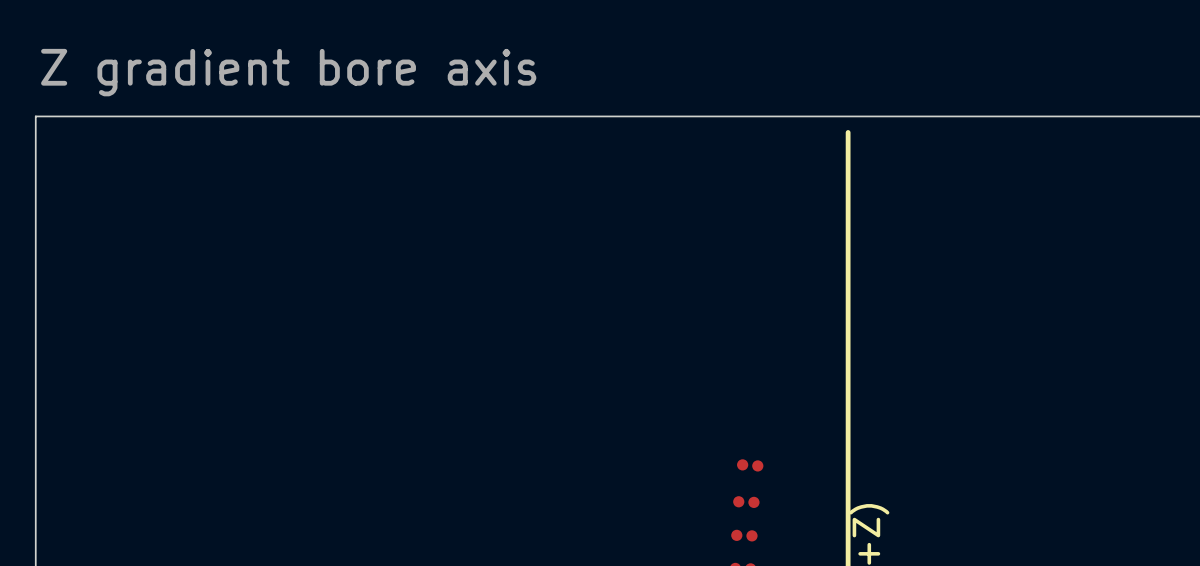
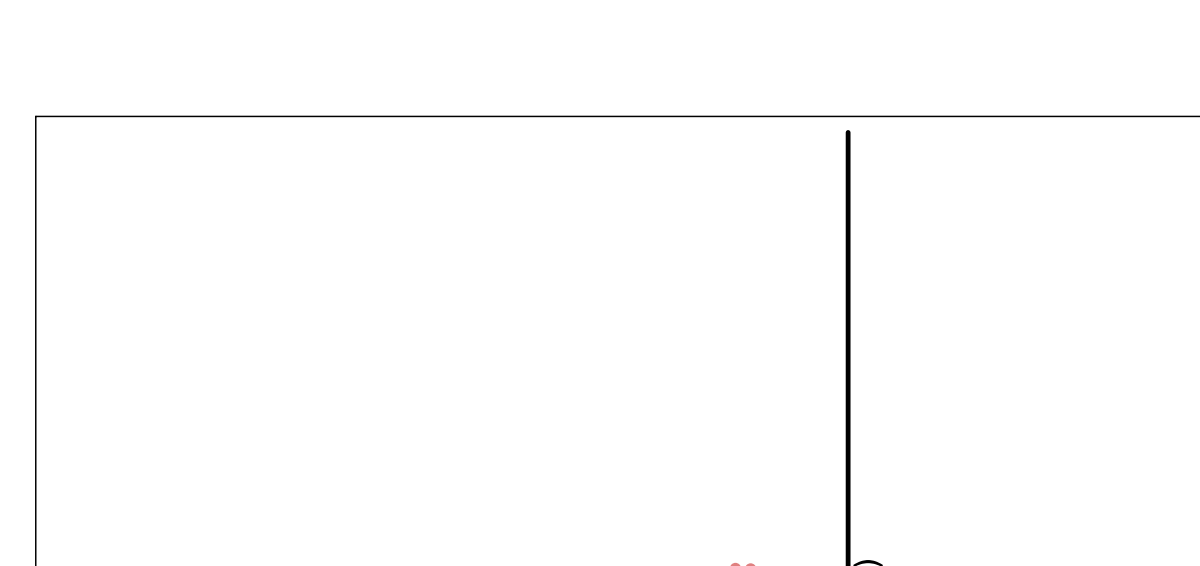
text: Z gradient bore axis (288, 72) -> none
part: (750, 465) -> none
part: (746, 502) -> none
part: (744, 535) -> none

